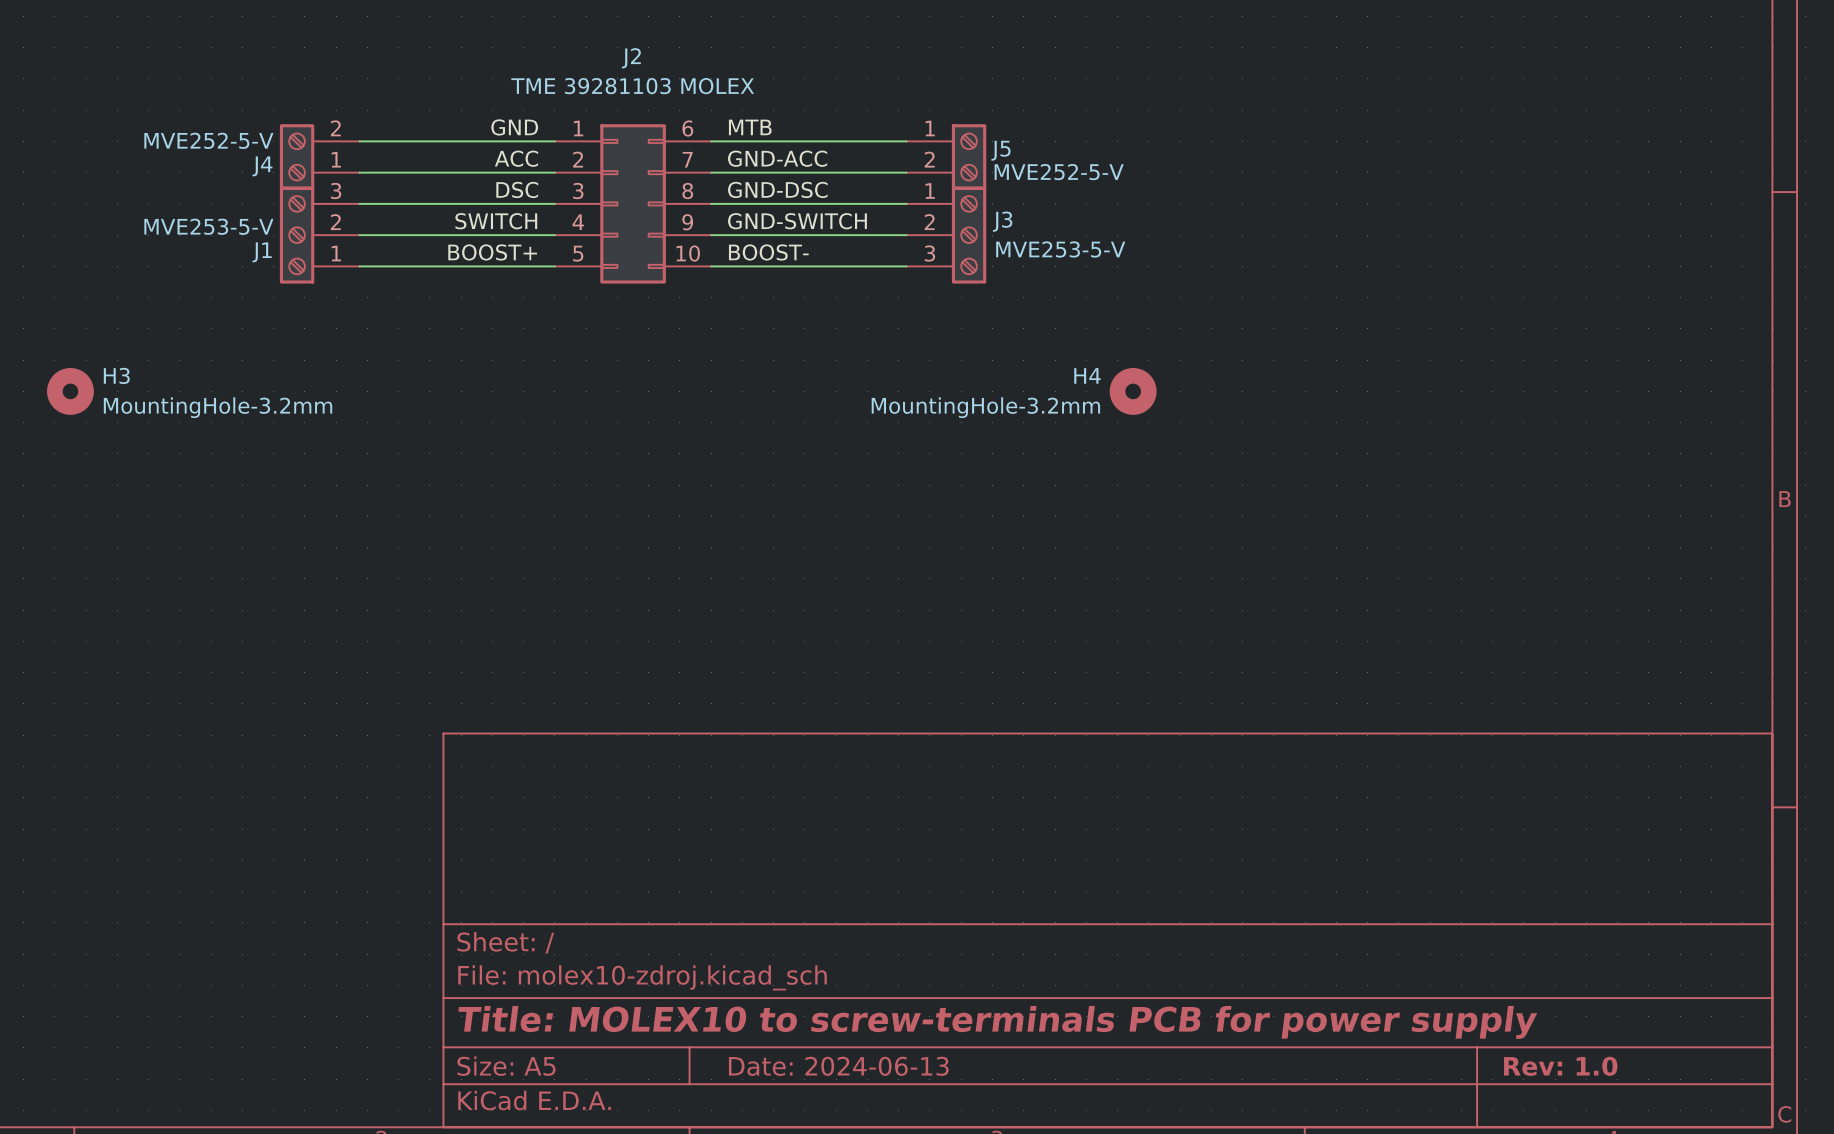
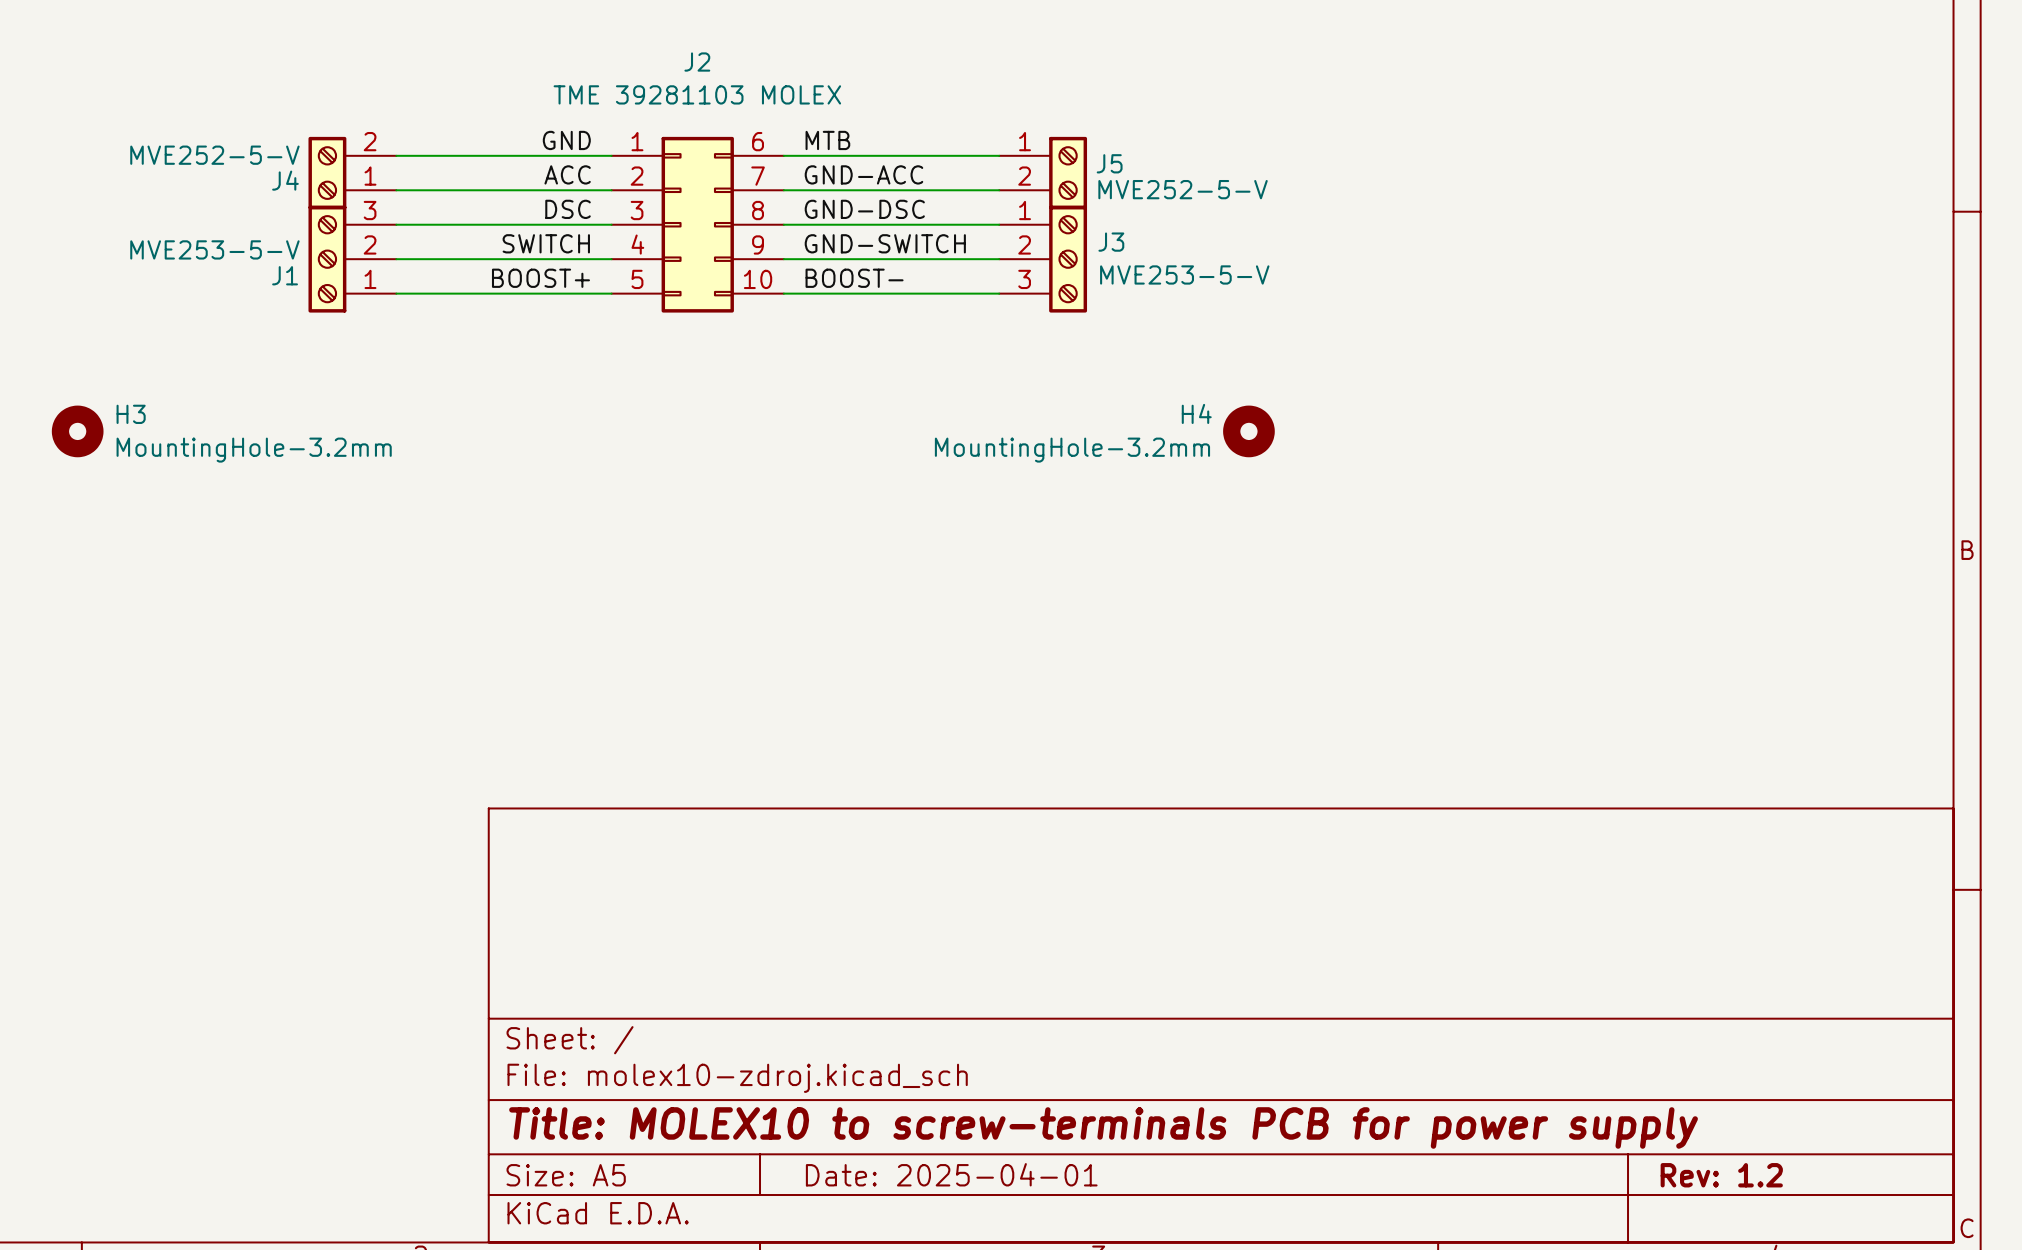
title block: Date: 2024-06-13 (838, 1066) -> Date: 2025-04-01 (951, 1174)
title block: Rev: 1.0 (1560, 1066) -> Rev: 1.2 (1721, 1175)

